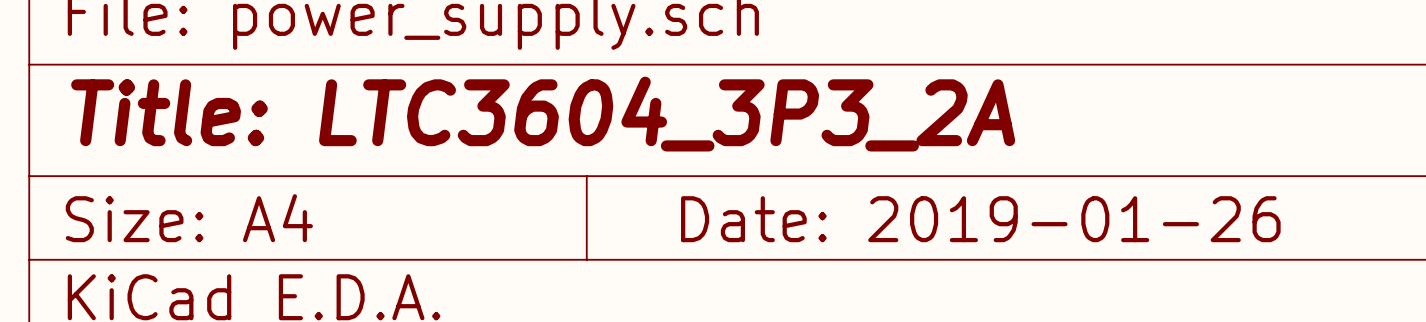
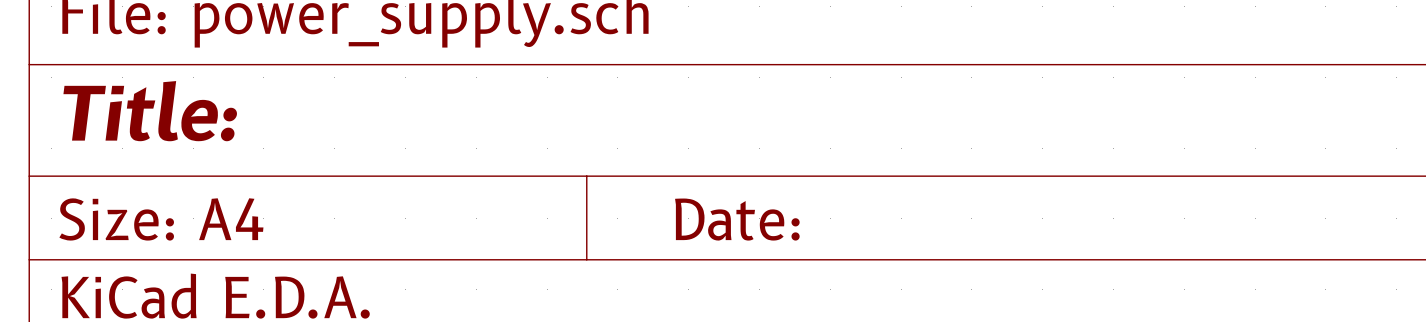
title block: Title: LTC3604_3P3_2A (543, 114) -> Title: (150, 111)
title block: Date: 2019-01-26 (980, 219) -> Date: (737, 219)

